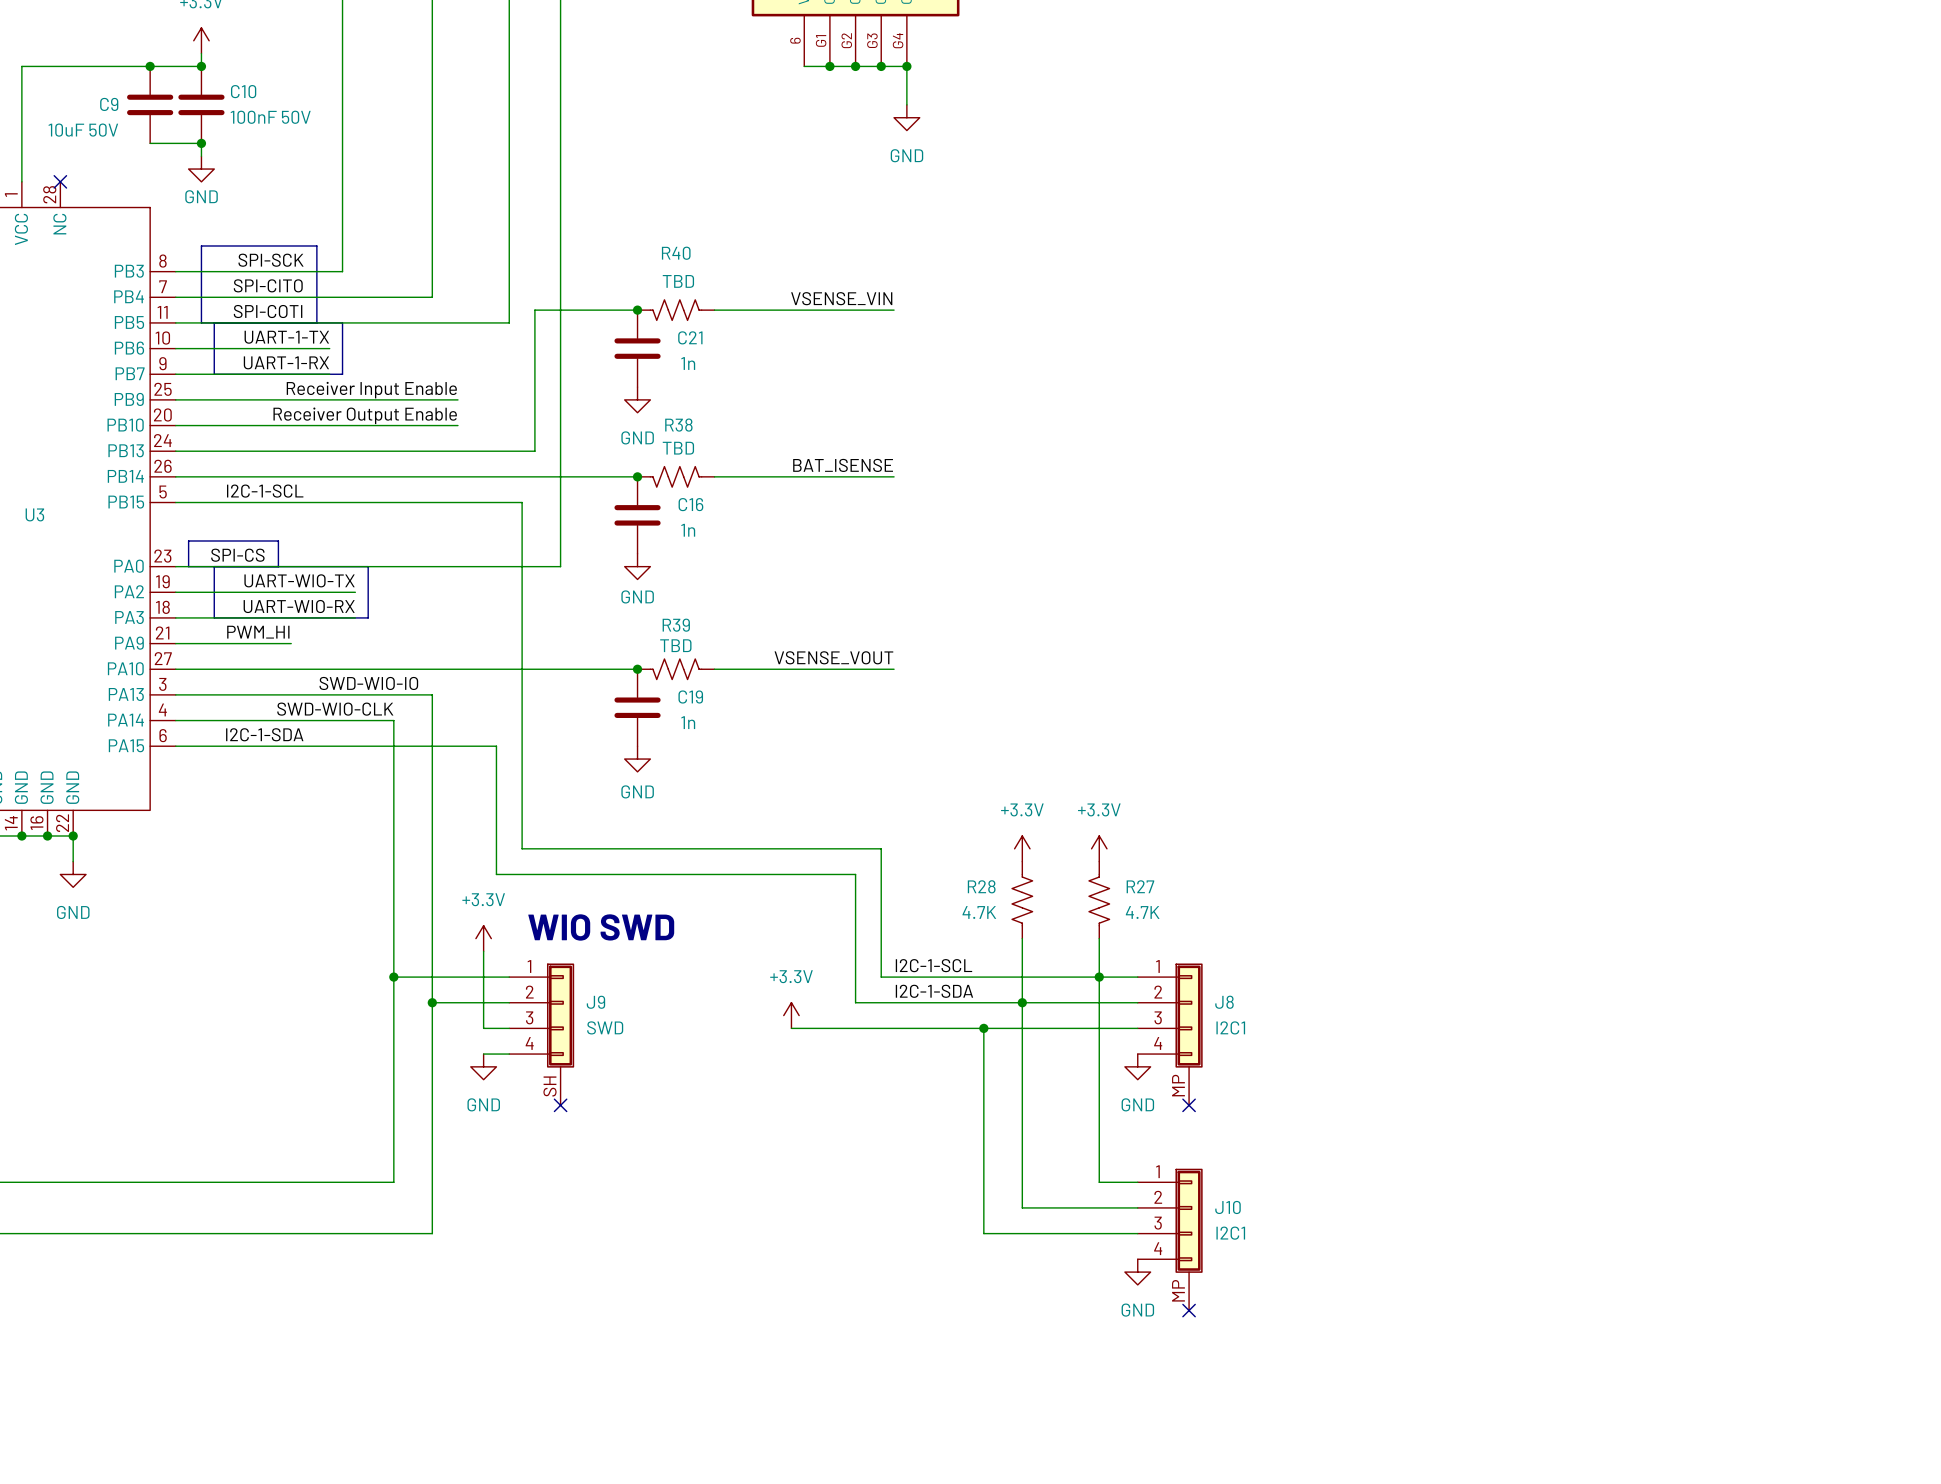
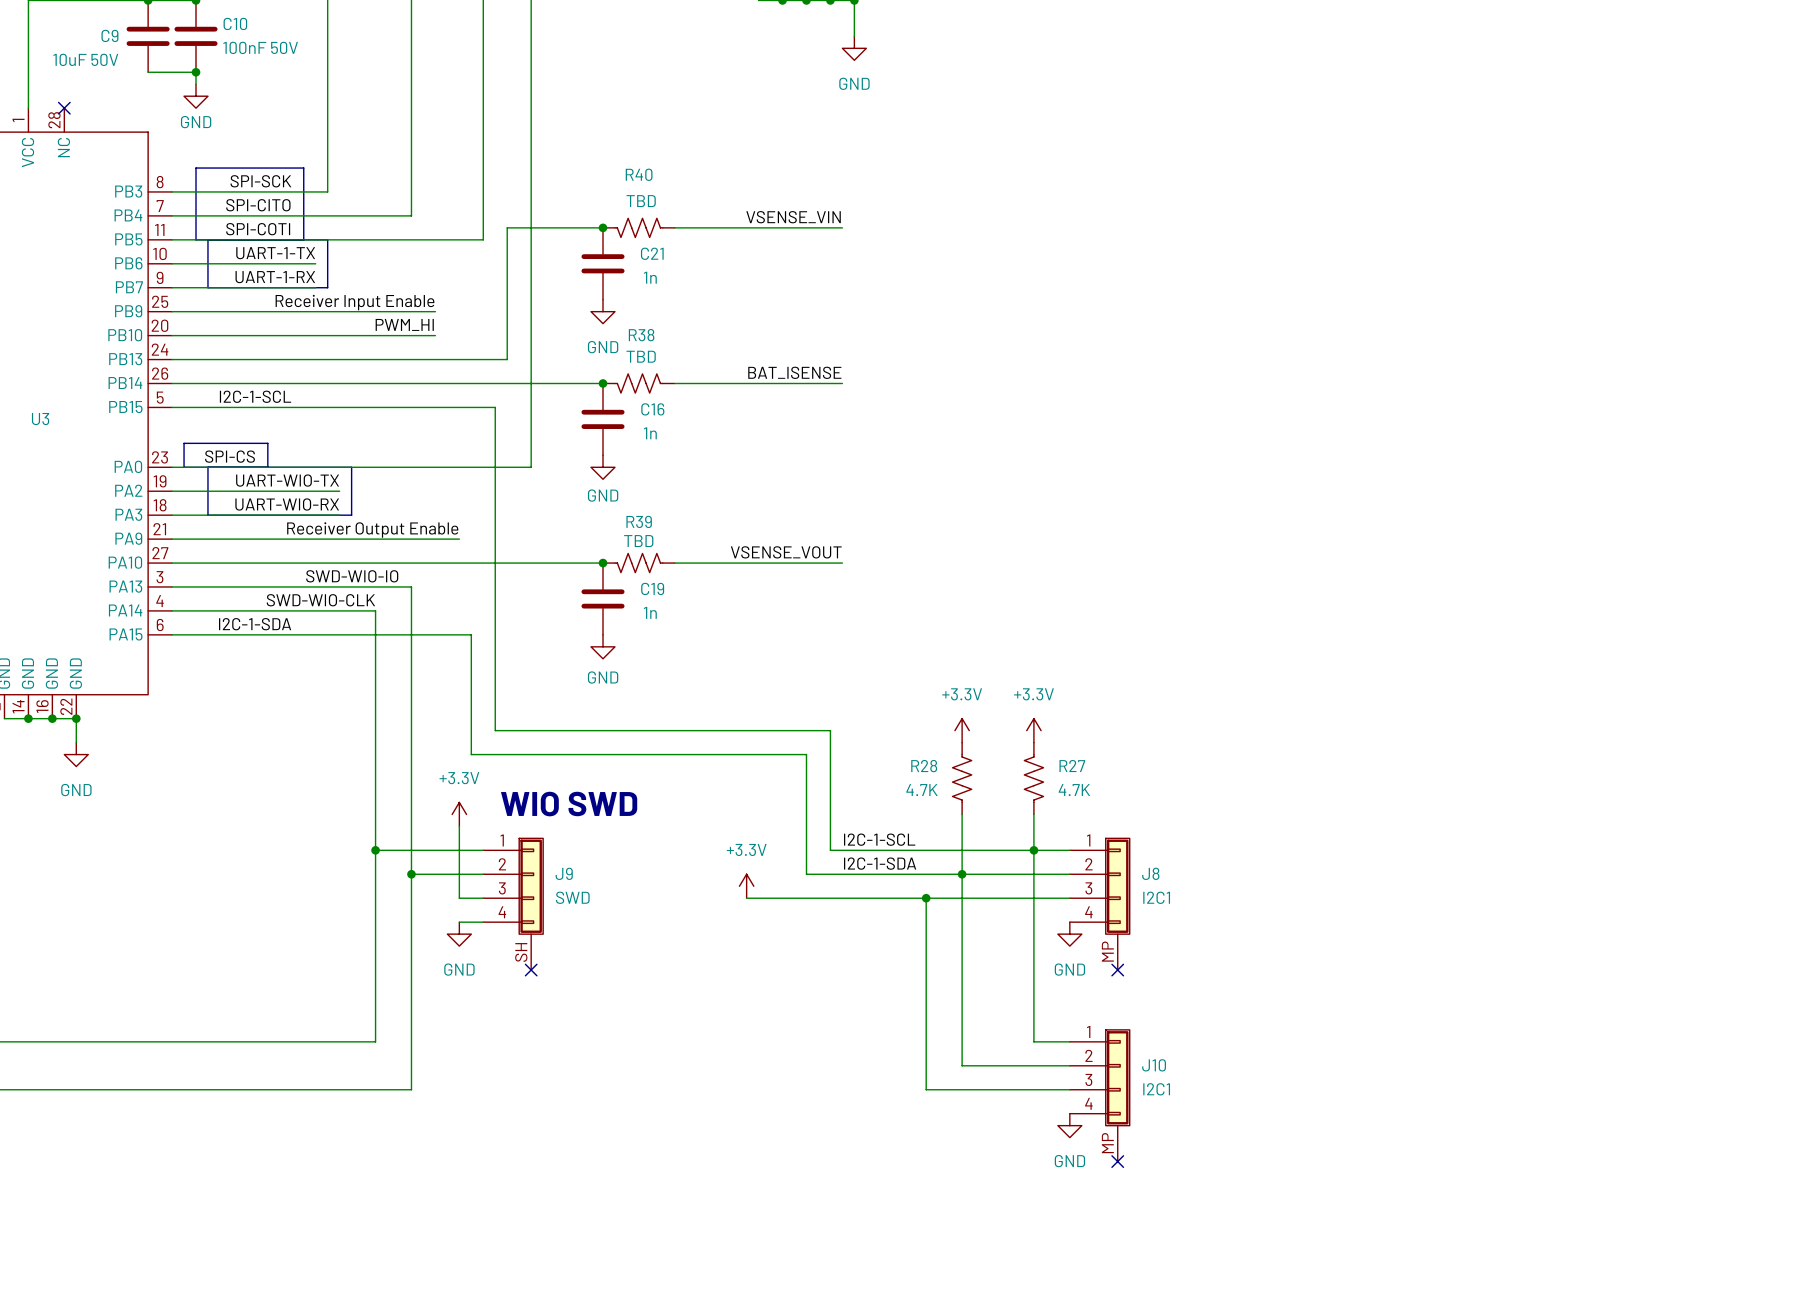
label: Receiver Output Enable (365, 415) -> PWM_HI (404, 324)
label: PWM_HI (258, 632) -> none
label: none -> Receiver Output Enable (372, 530)
wire: none -> (279, 539) (459, 539)

